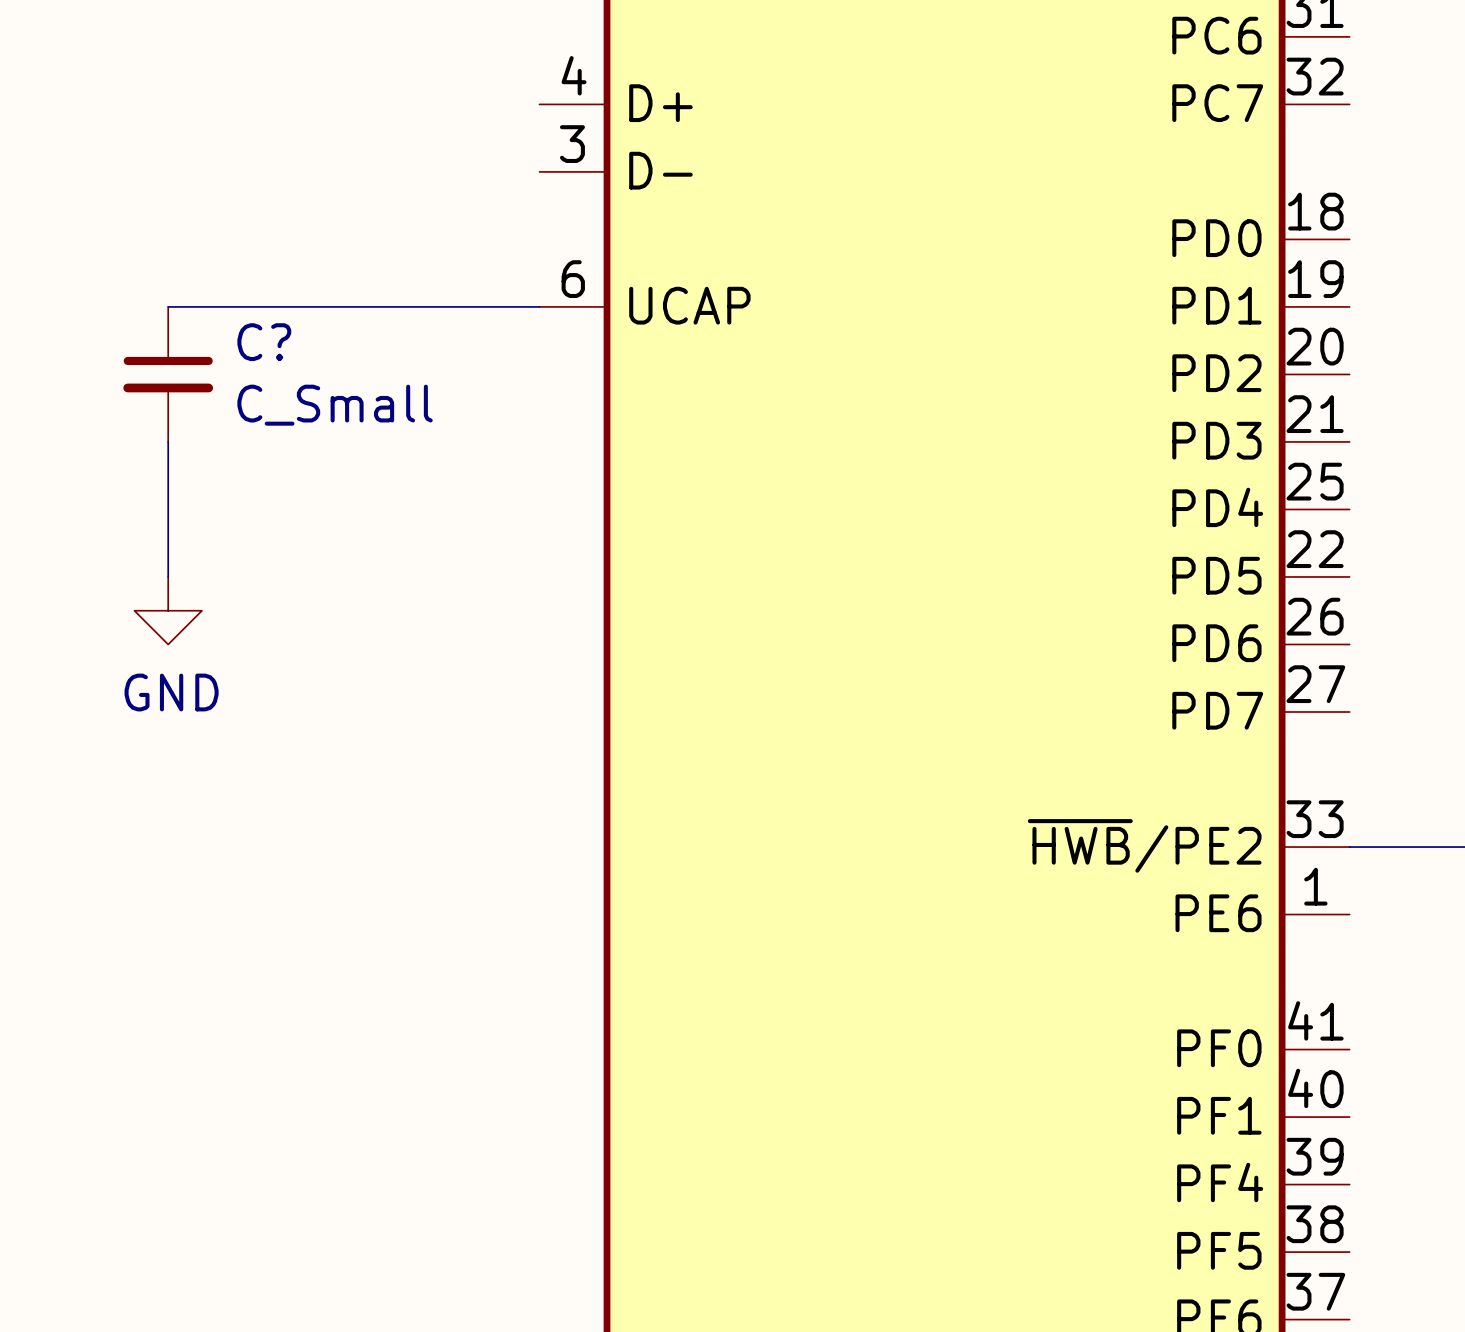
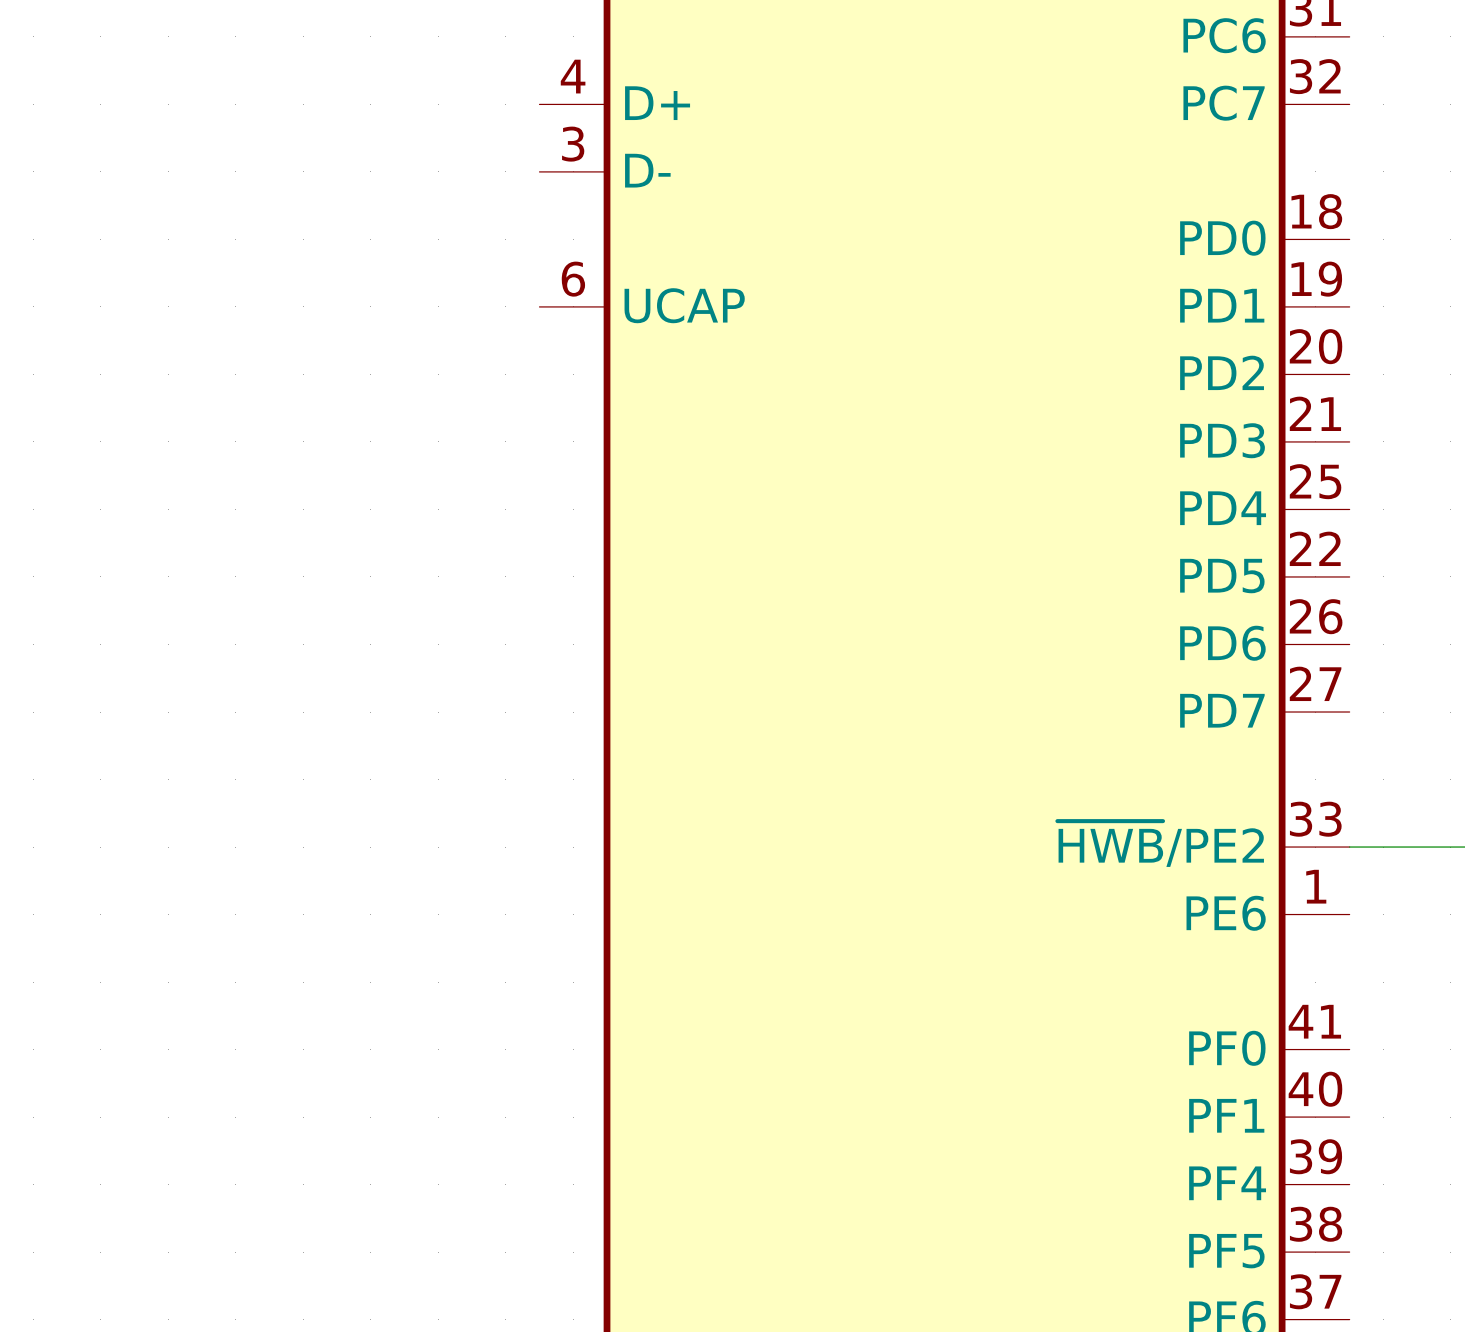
wire: (168, 306) (539, 306) -> none
C?: C_Small (168, 374) -> none
wire: (168, 441) (168, 576) -> none
power symbol: GND (168, 610) -> none

